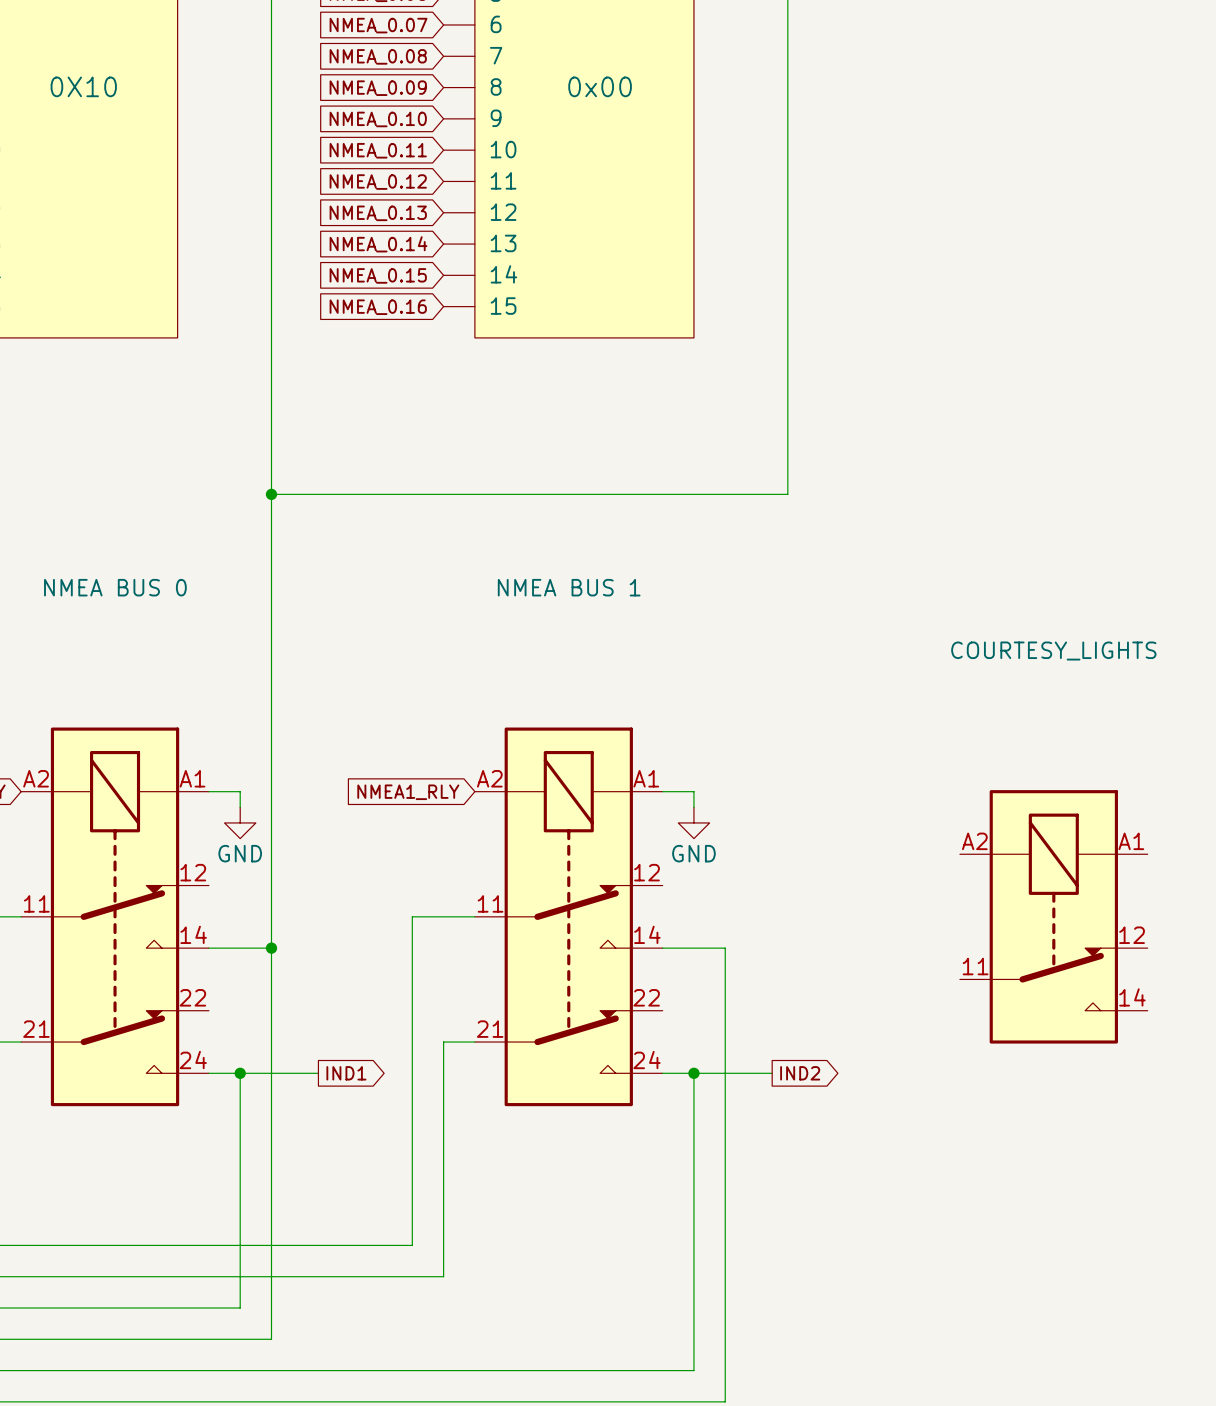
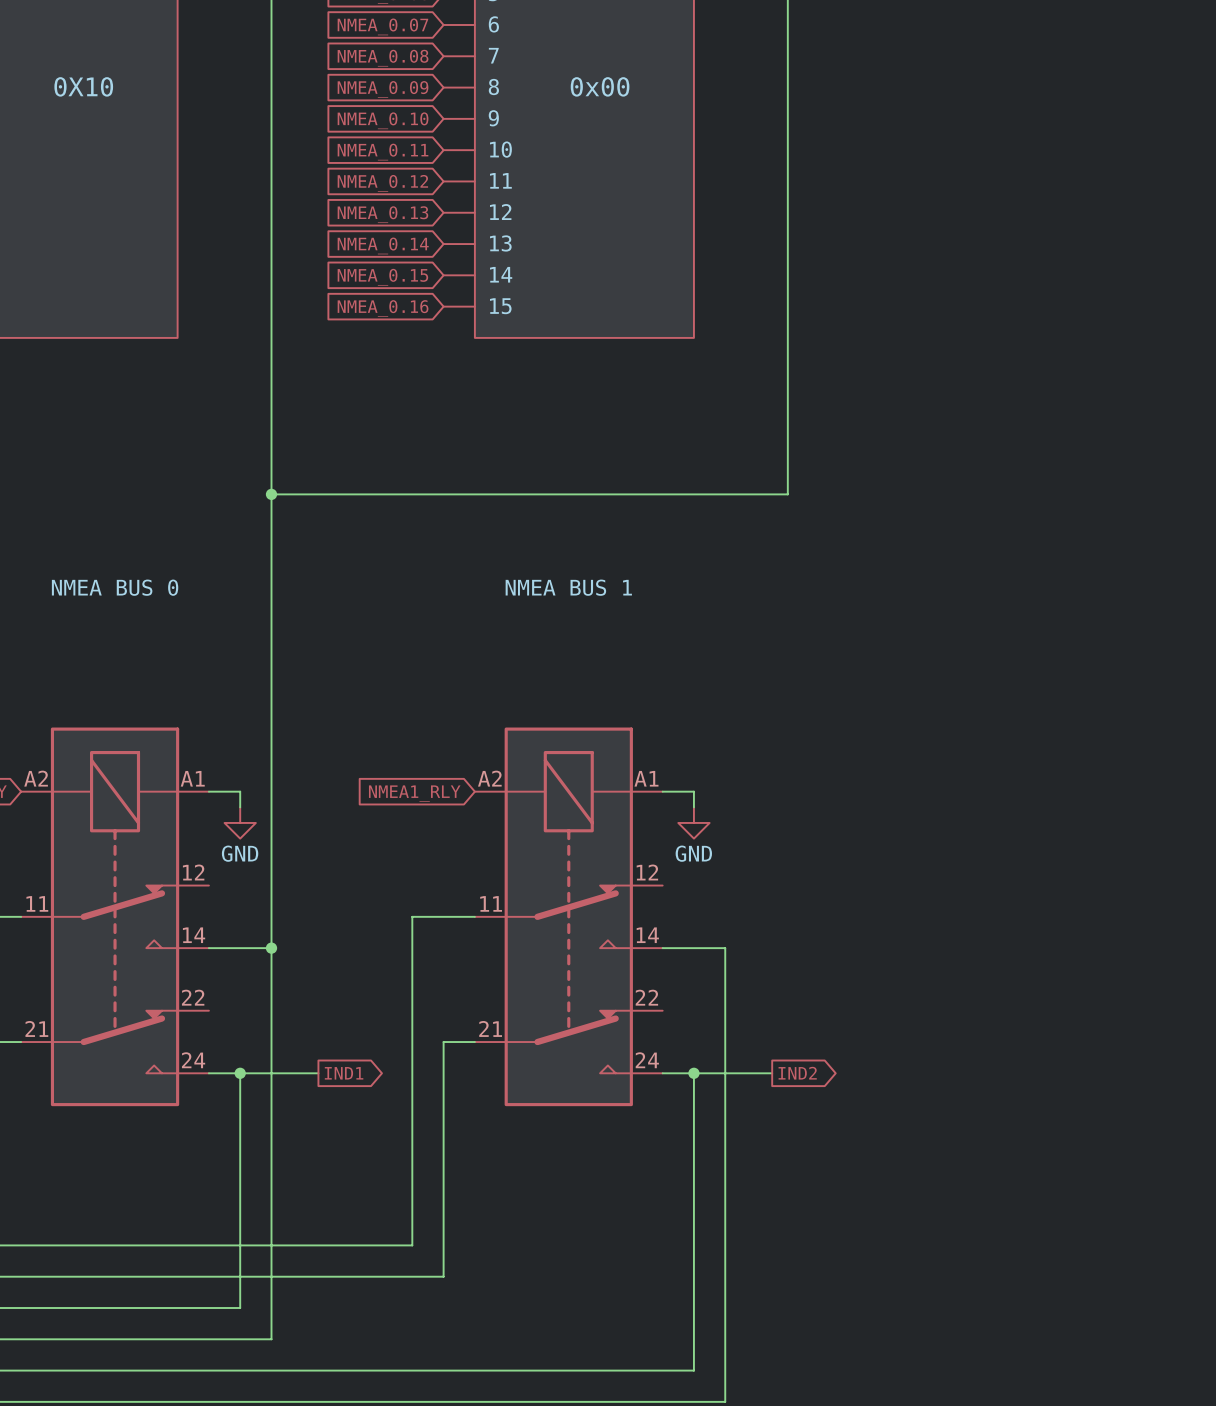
part: COURTESY_LIGHTS (1053, 916) -> none

